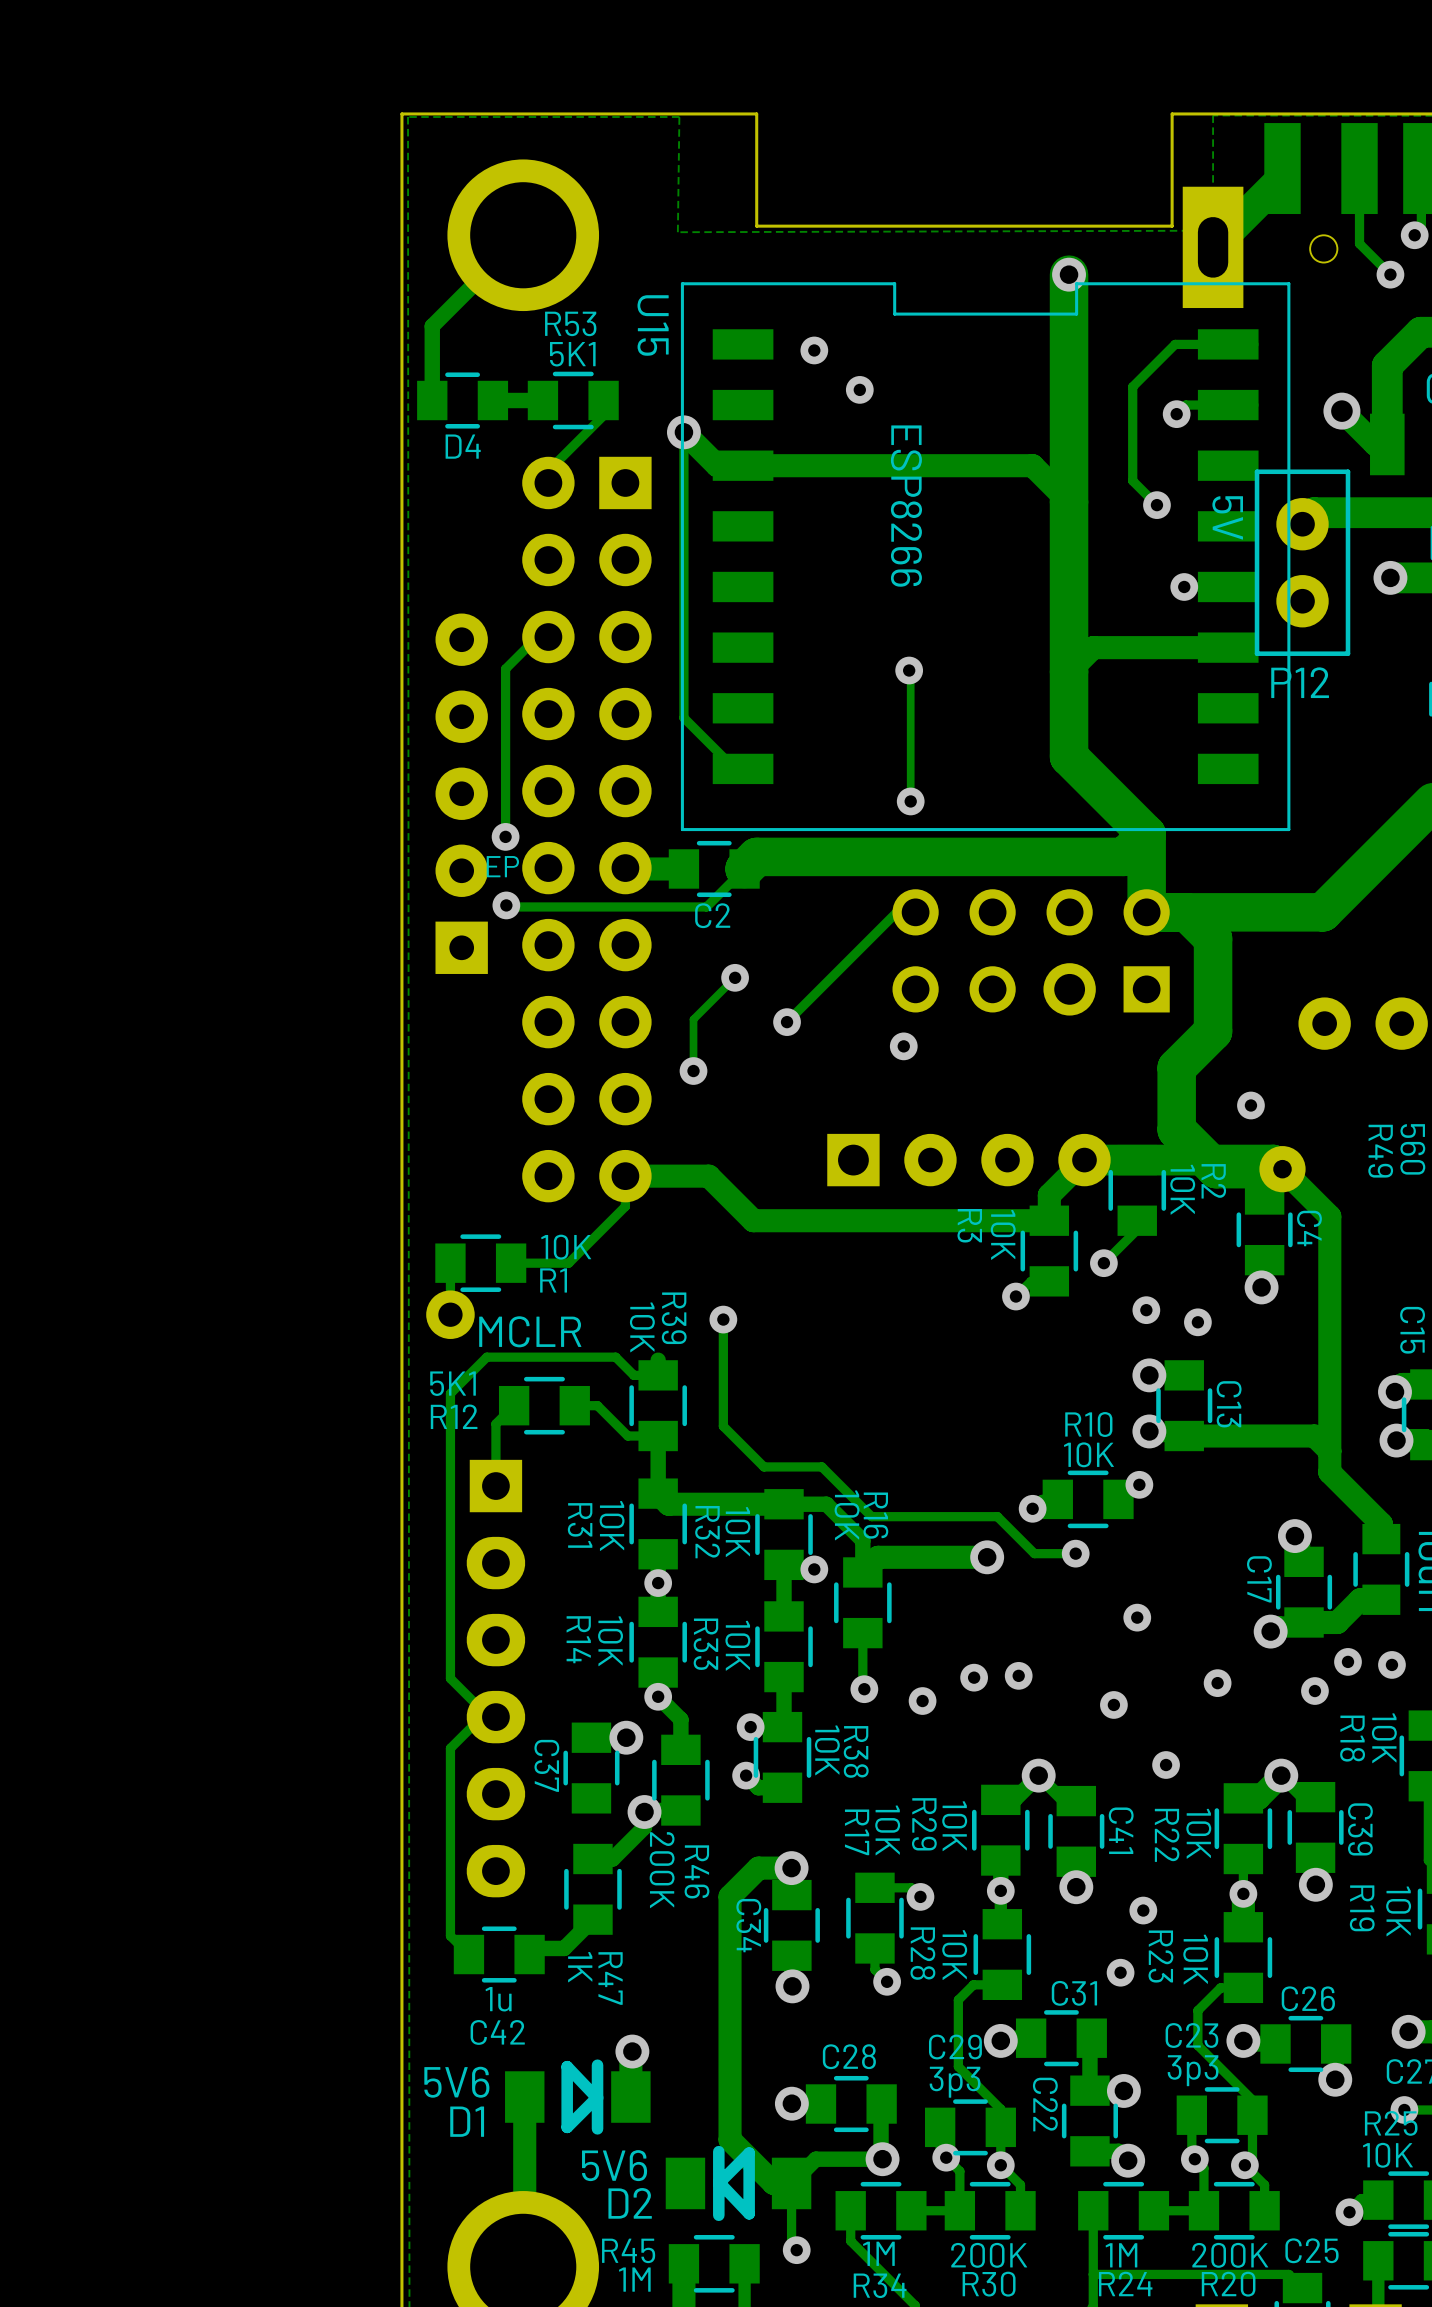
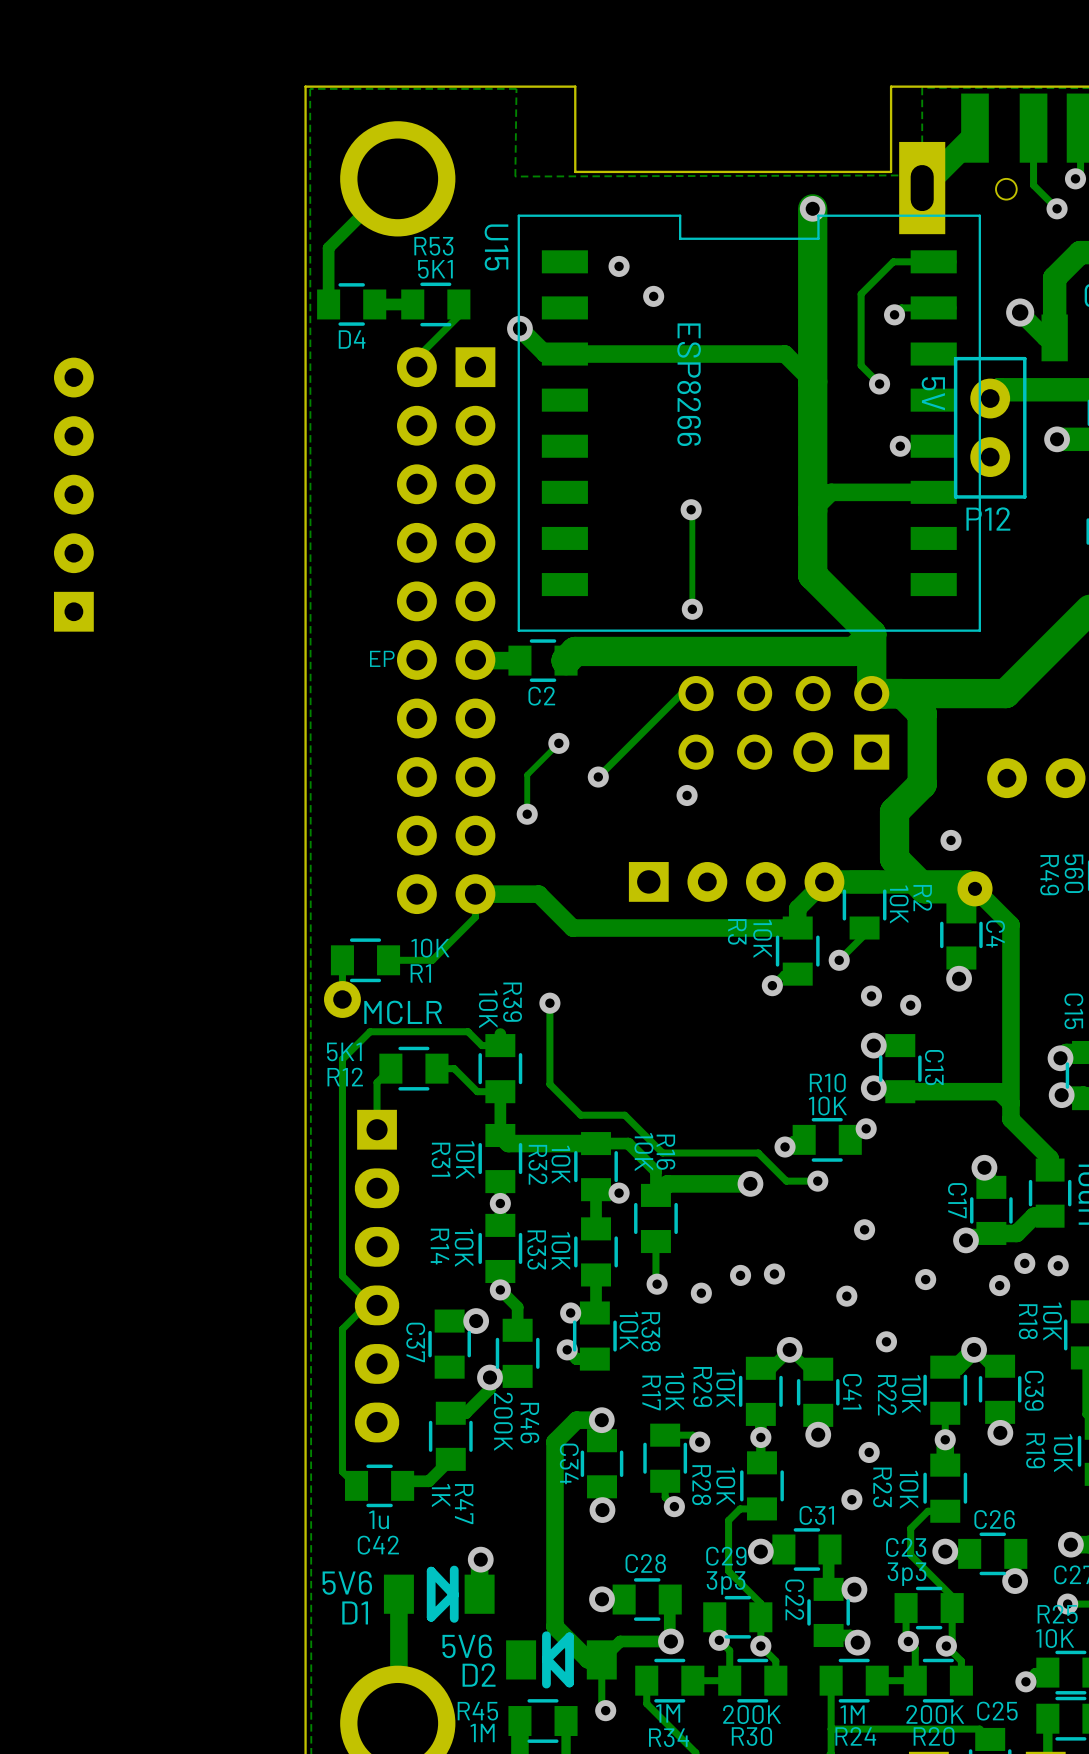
track: (683, 432) (683, 717) (734, 768) (743, 768) -> none
track: (548, 637) (537, 637) (505, 668) (505, 836) -> none
part position: (461, 793) -> (73, 494)
via: (505, 836) -> none
track: (744, 868) (706, 906) (507, 906) (506, 905) -> none
via: (506, 905) -> none

